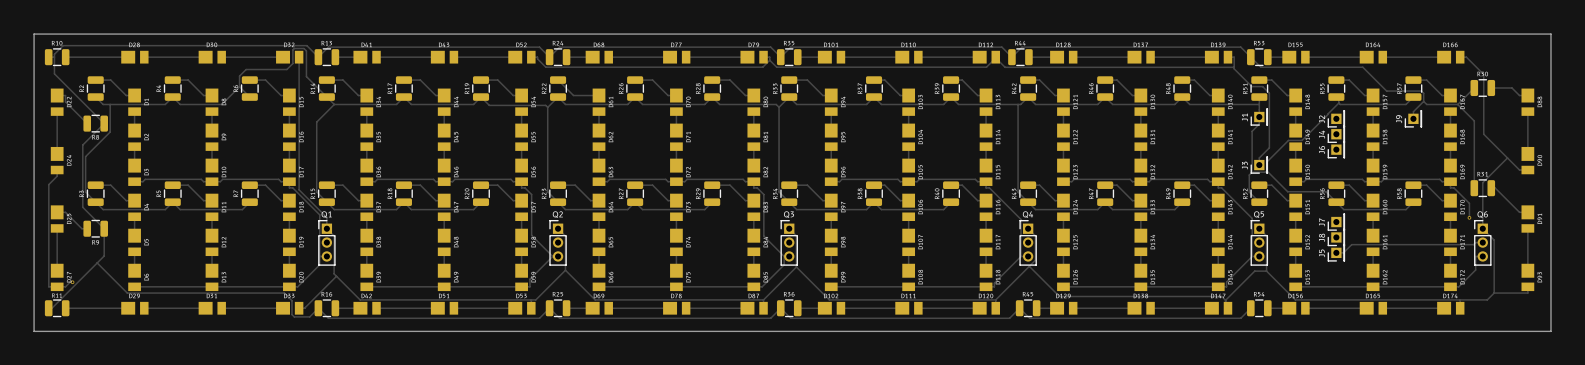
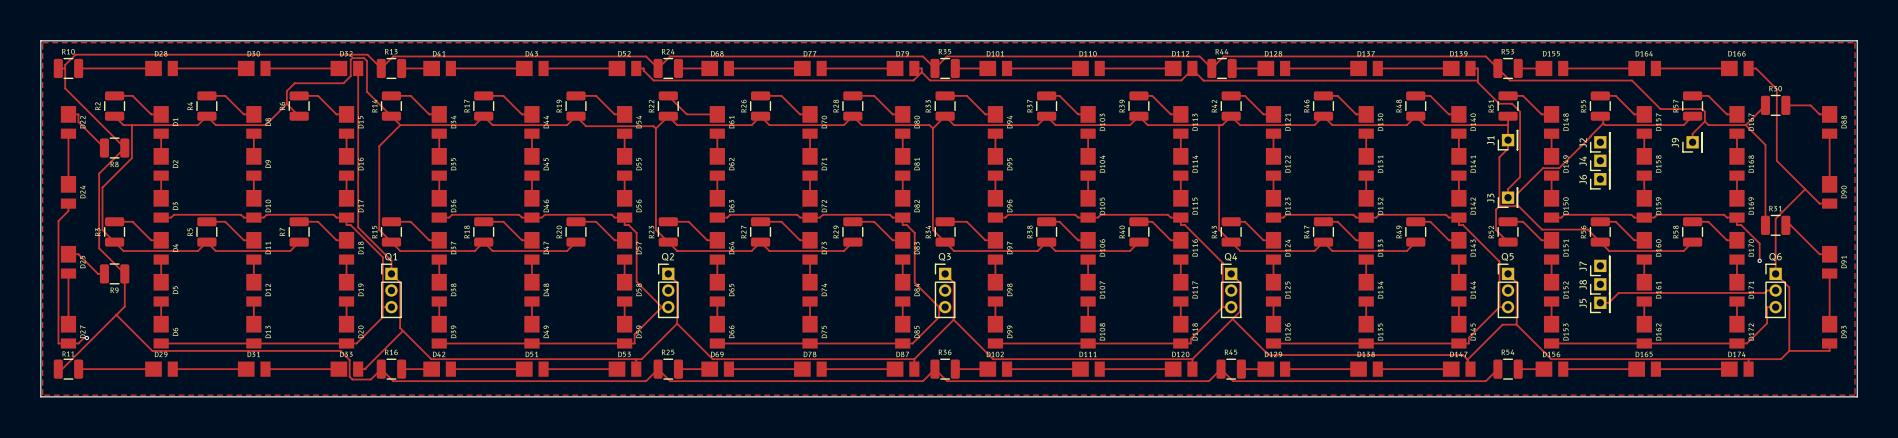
zone outline: none -> (42, 42) (42, 395) (1855, 395) (1855, 42) (42, 42)

